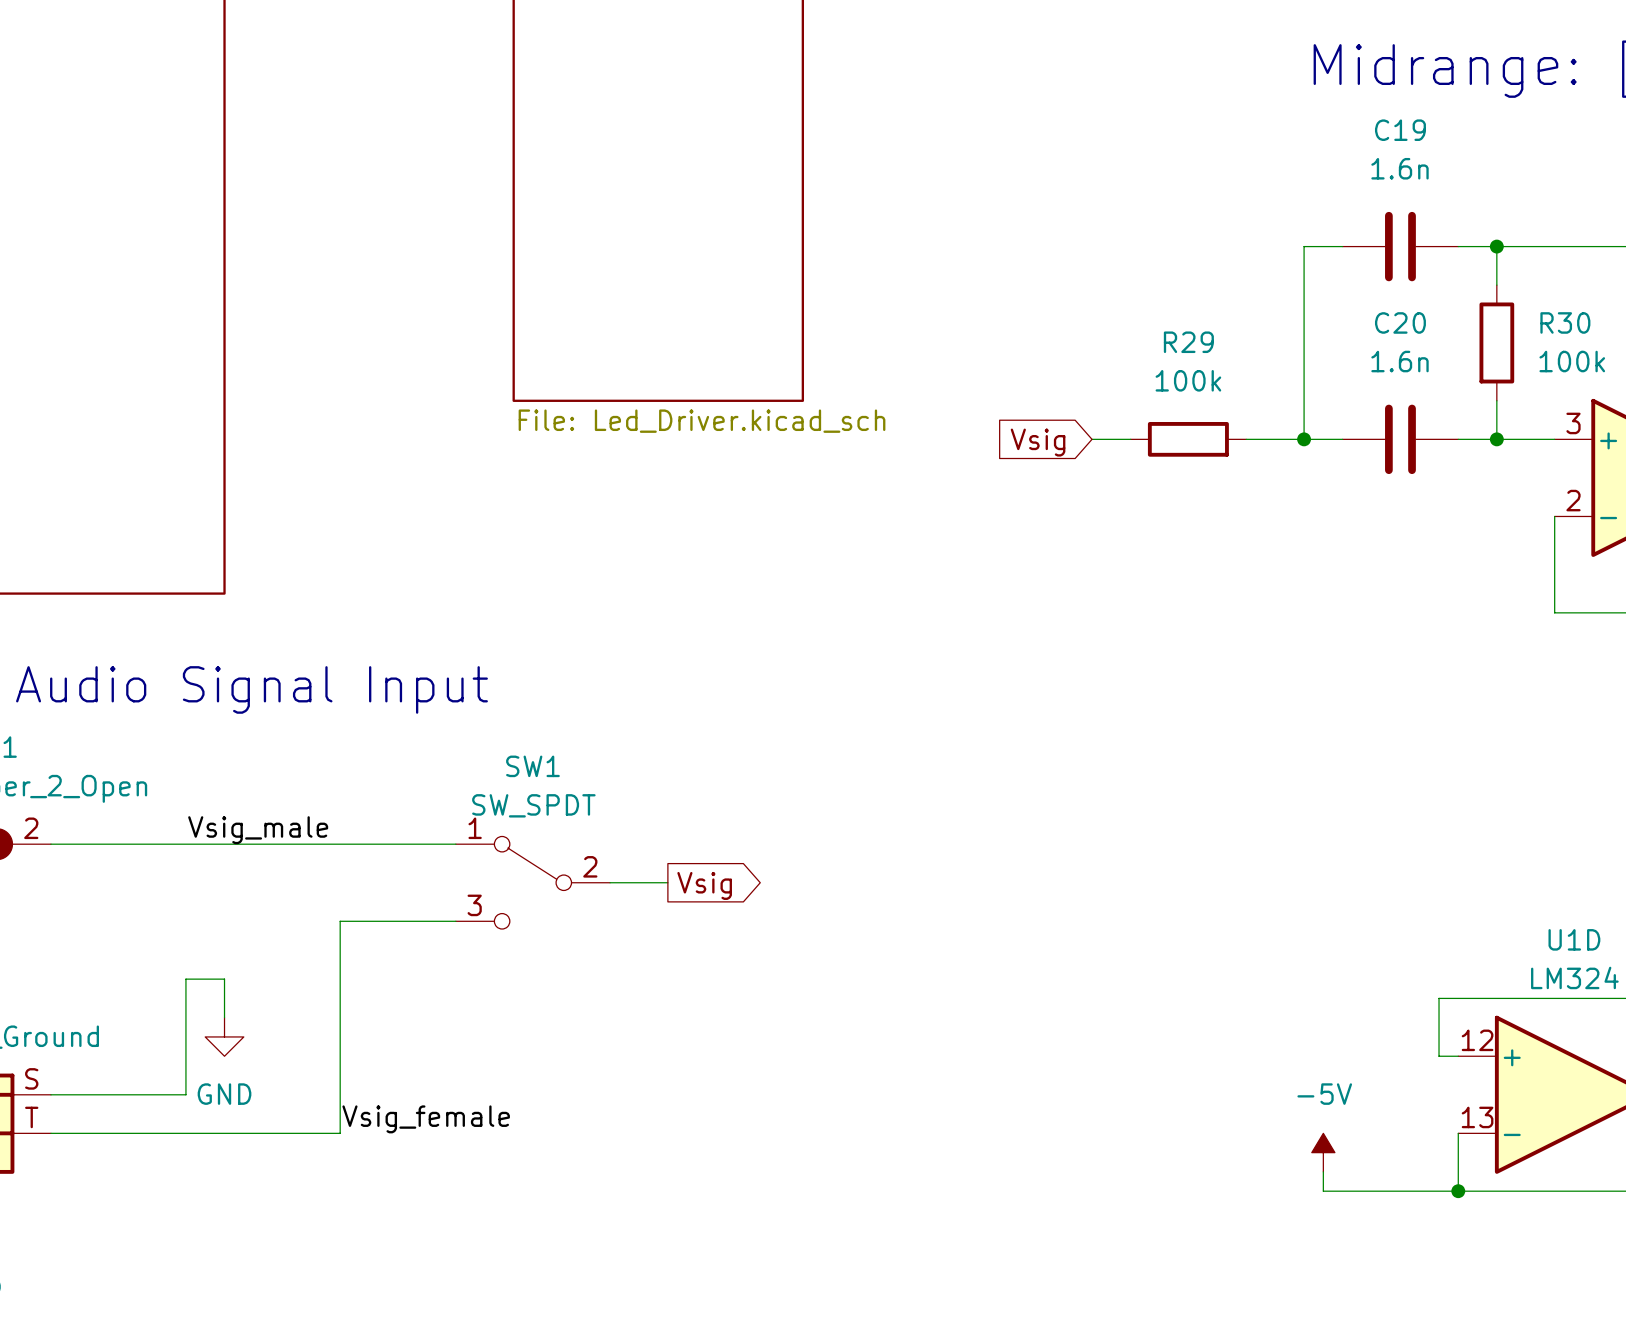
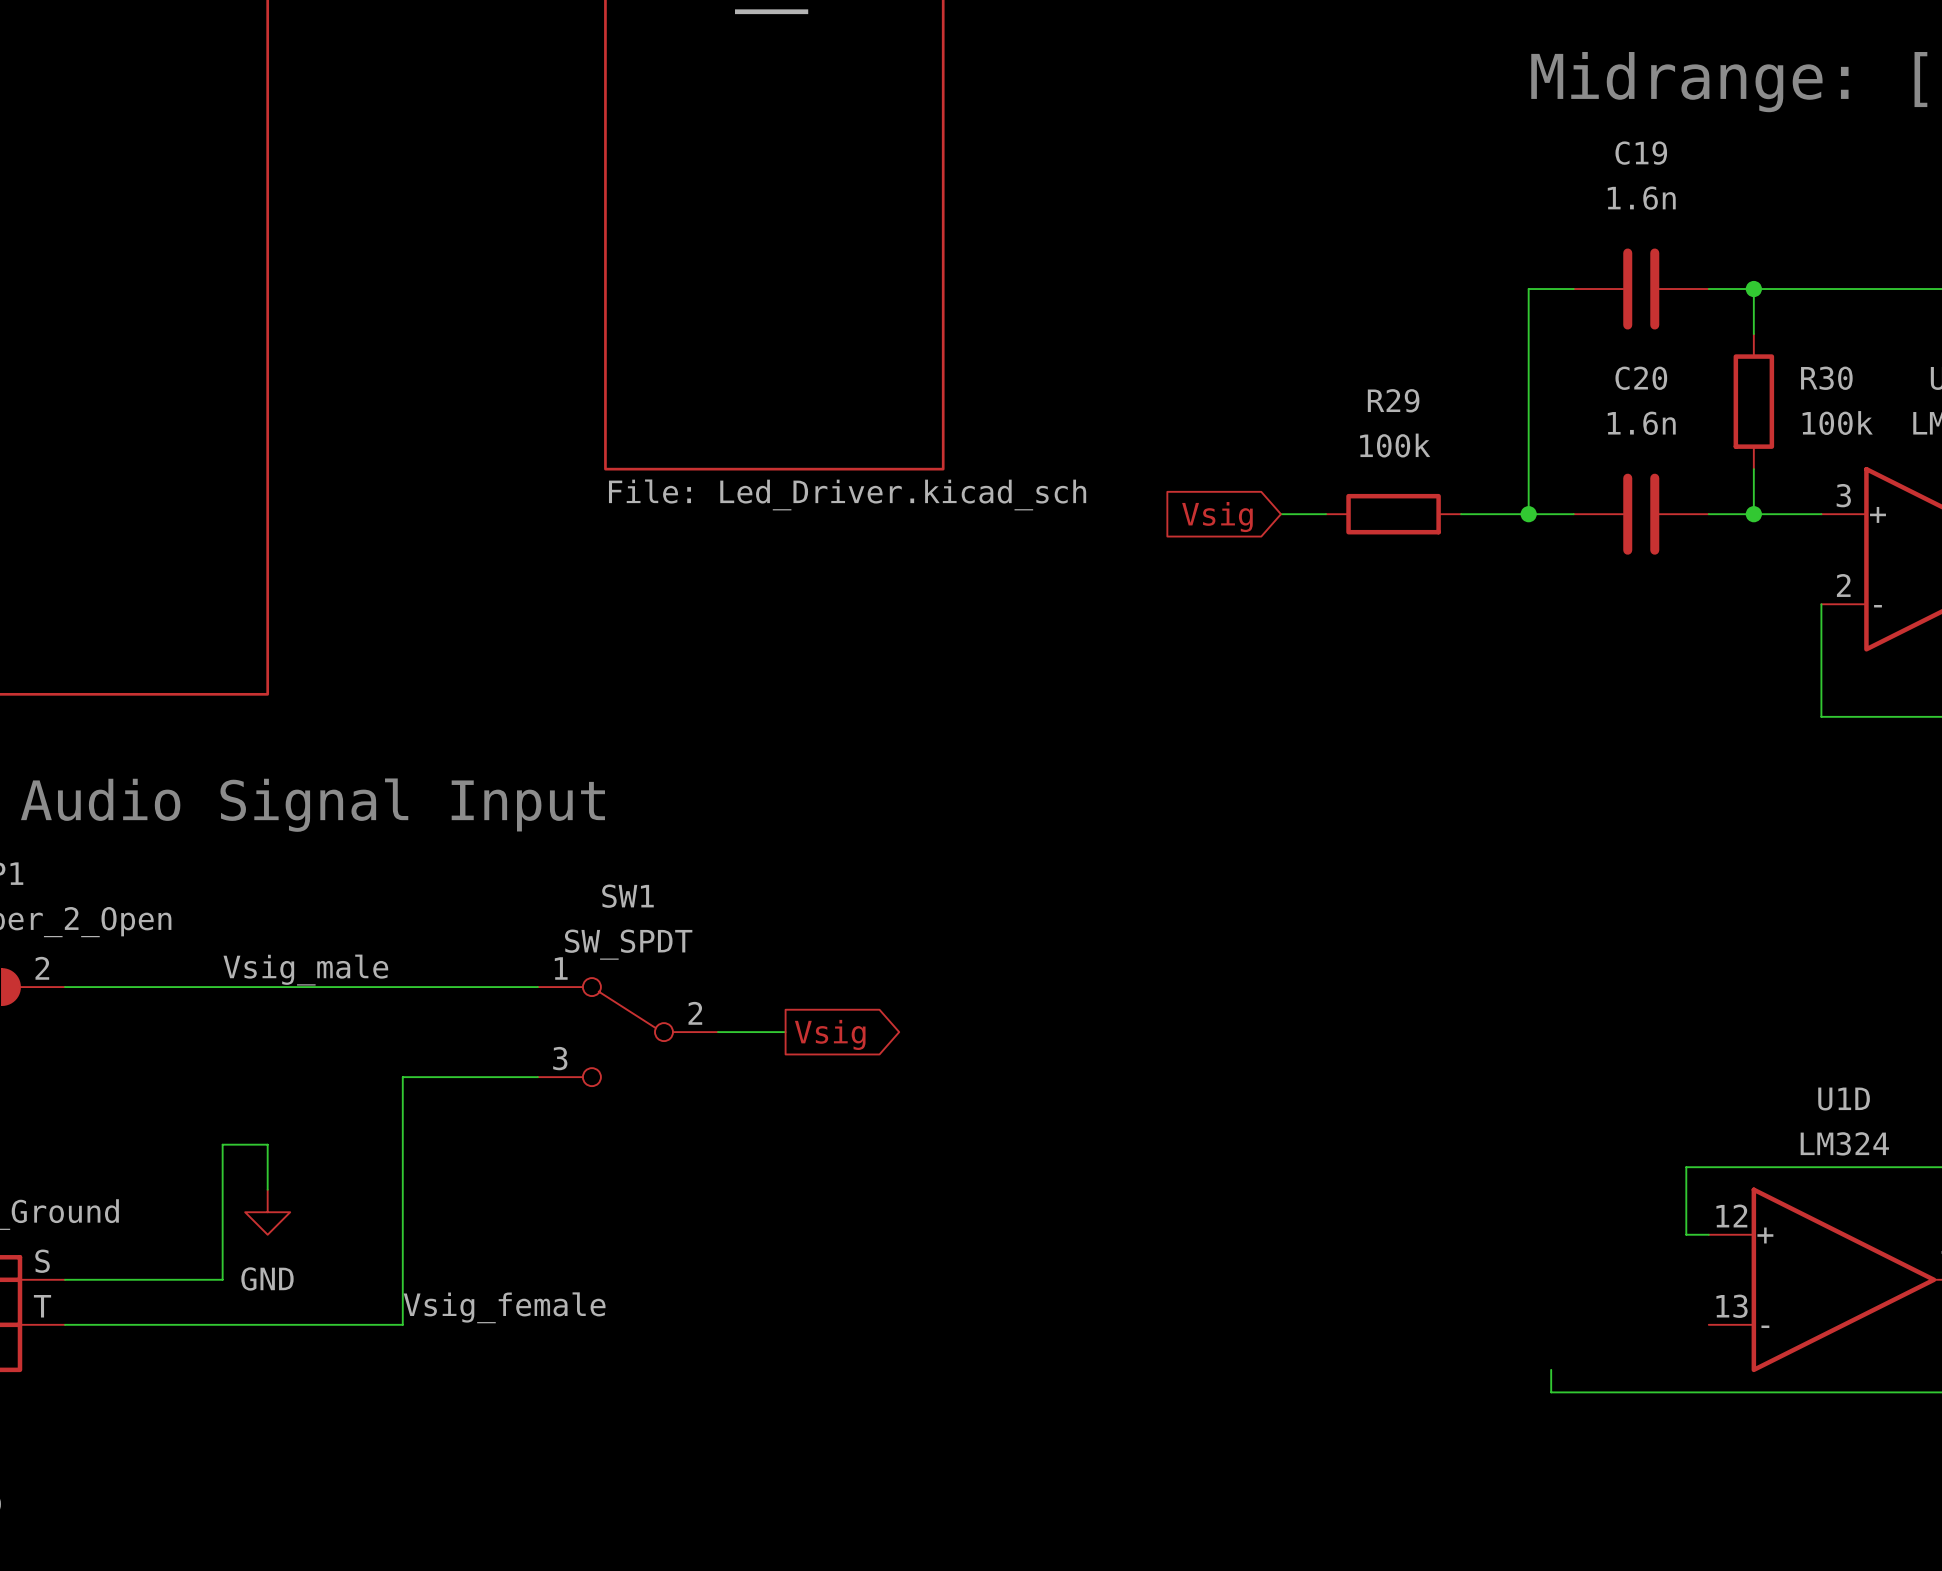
wire: (1458, 1133) (1458, 1191) -> none
power symbol: -5V (1323, 1152) -> none
junction: (1458, 1191) -> none

